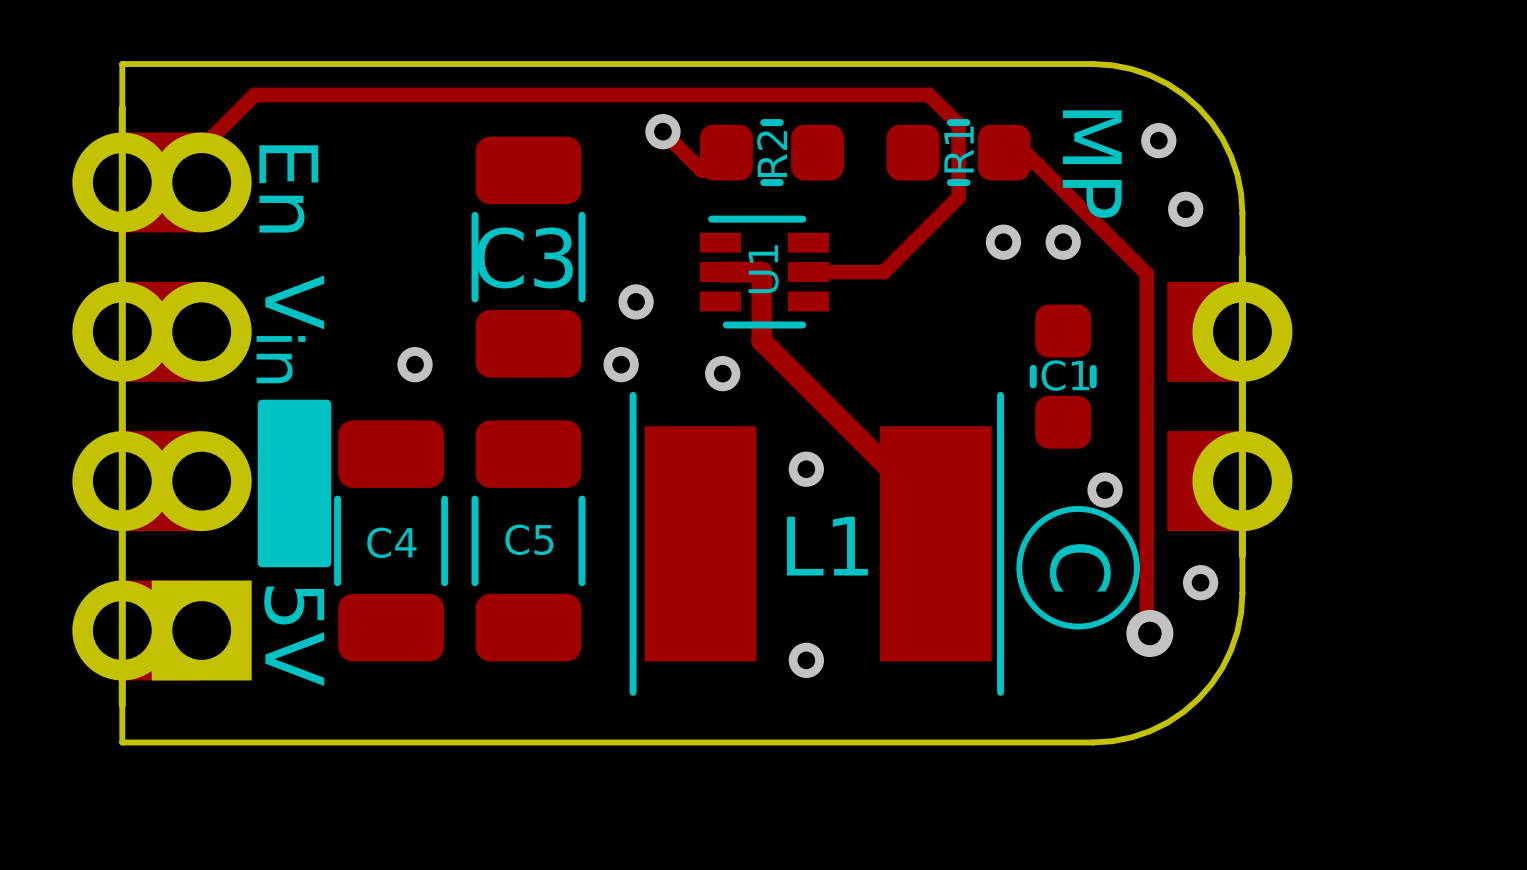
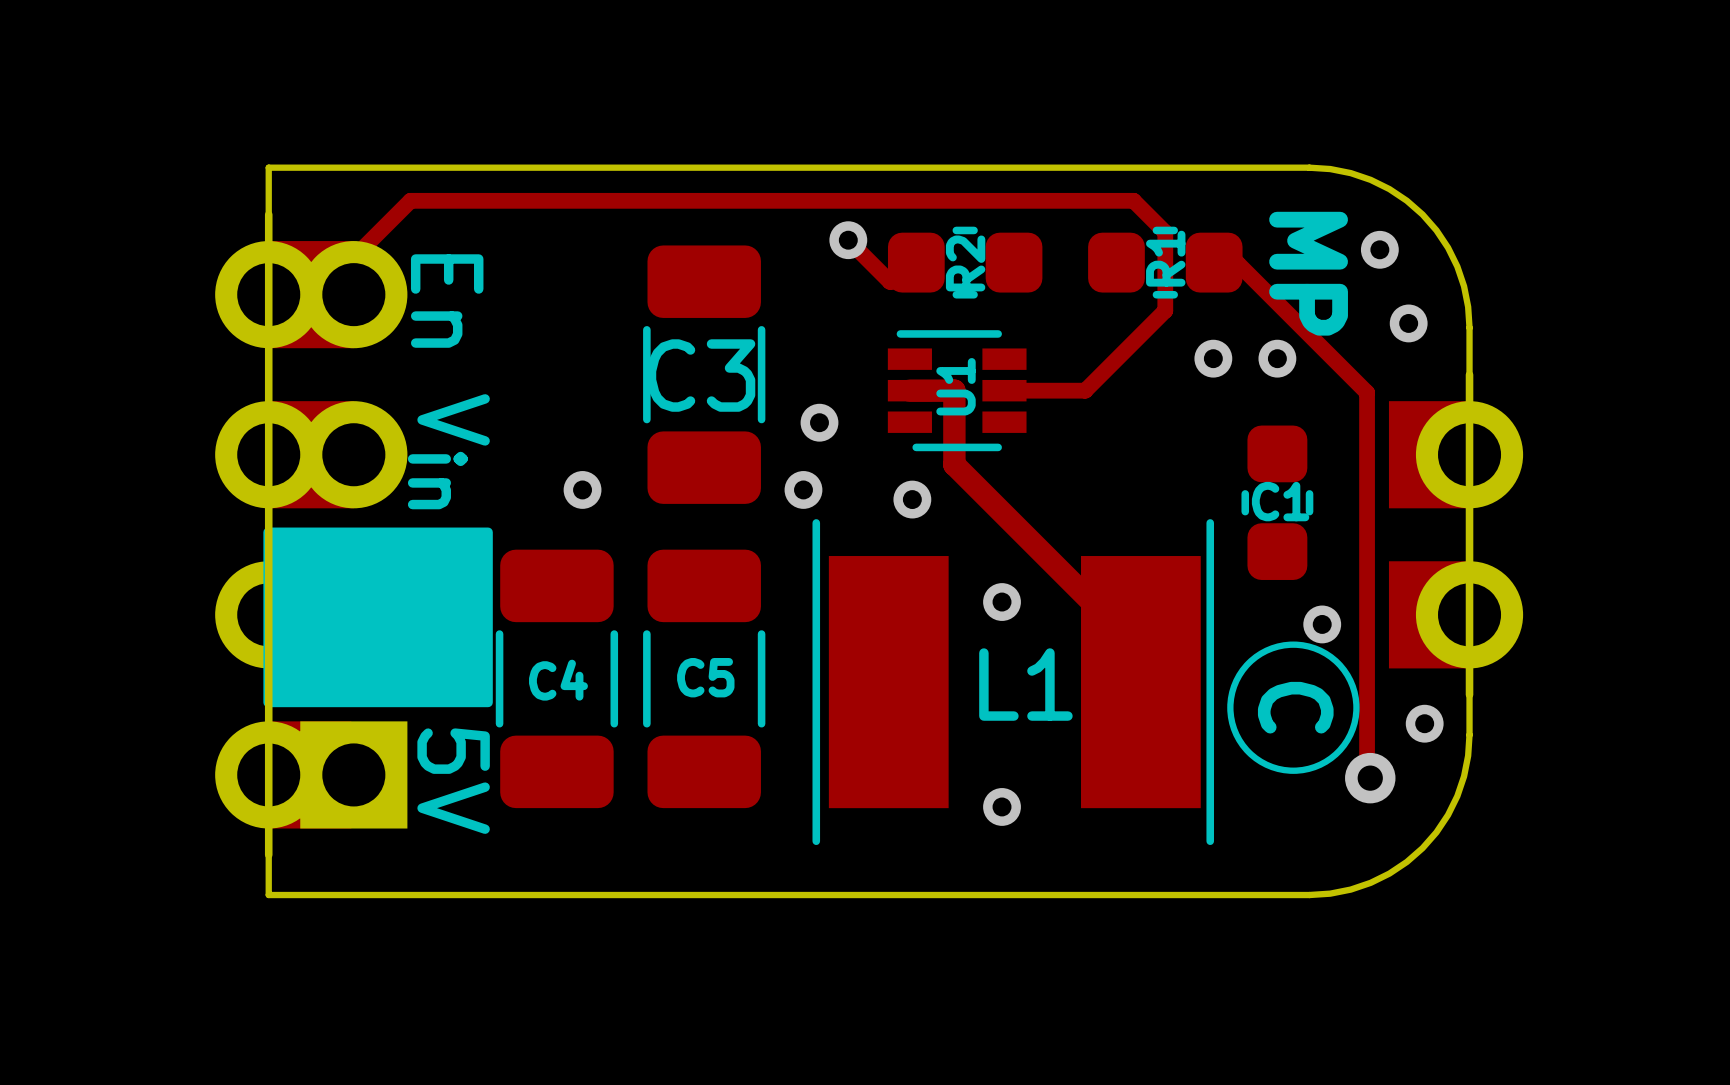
drawing: none -> [263, 527, 493, 708]
drawing: [257, 399, 332, 568] -> none

